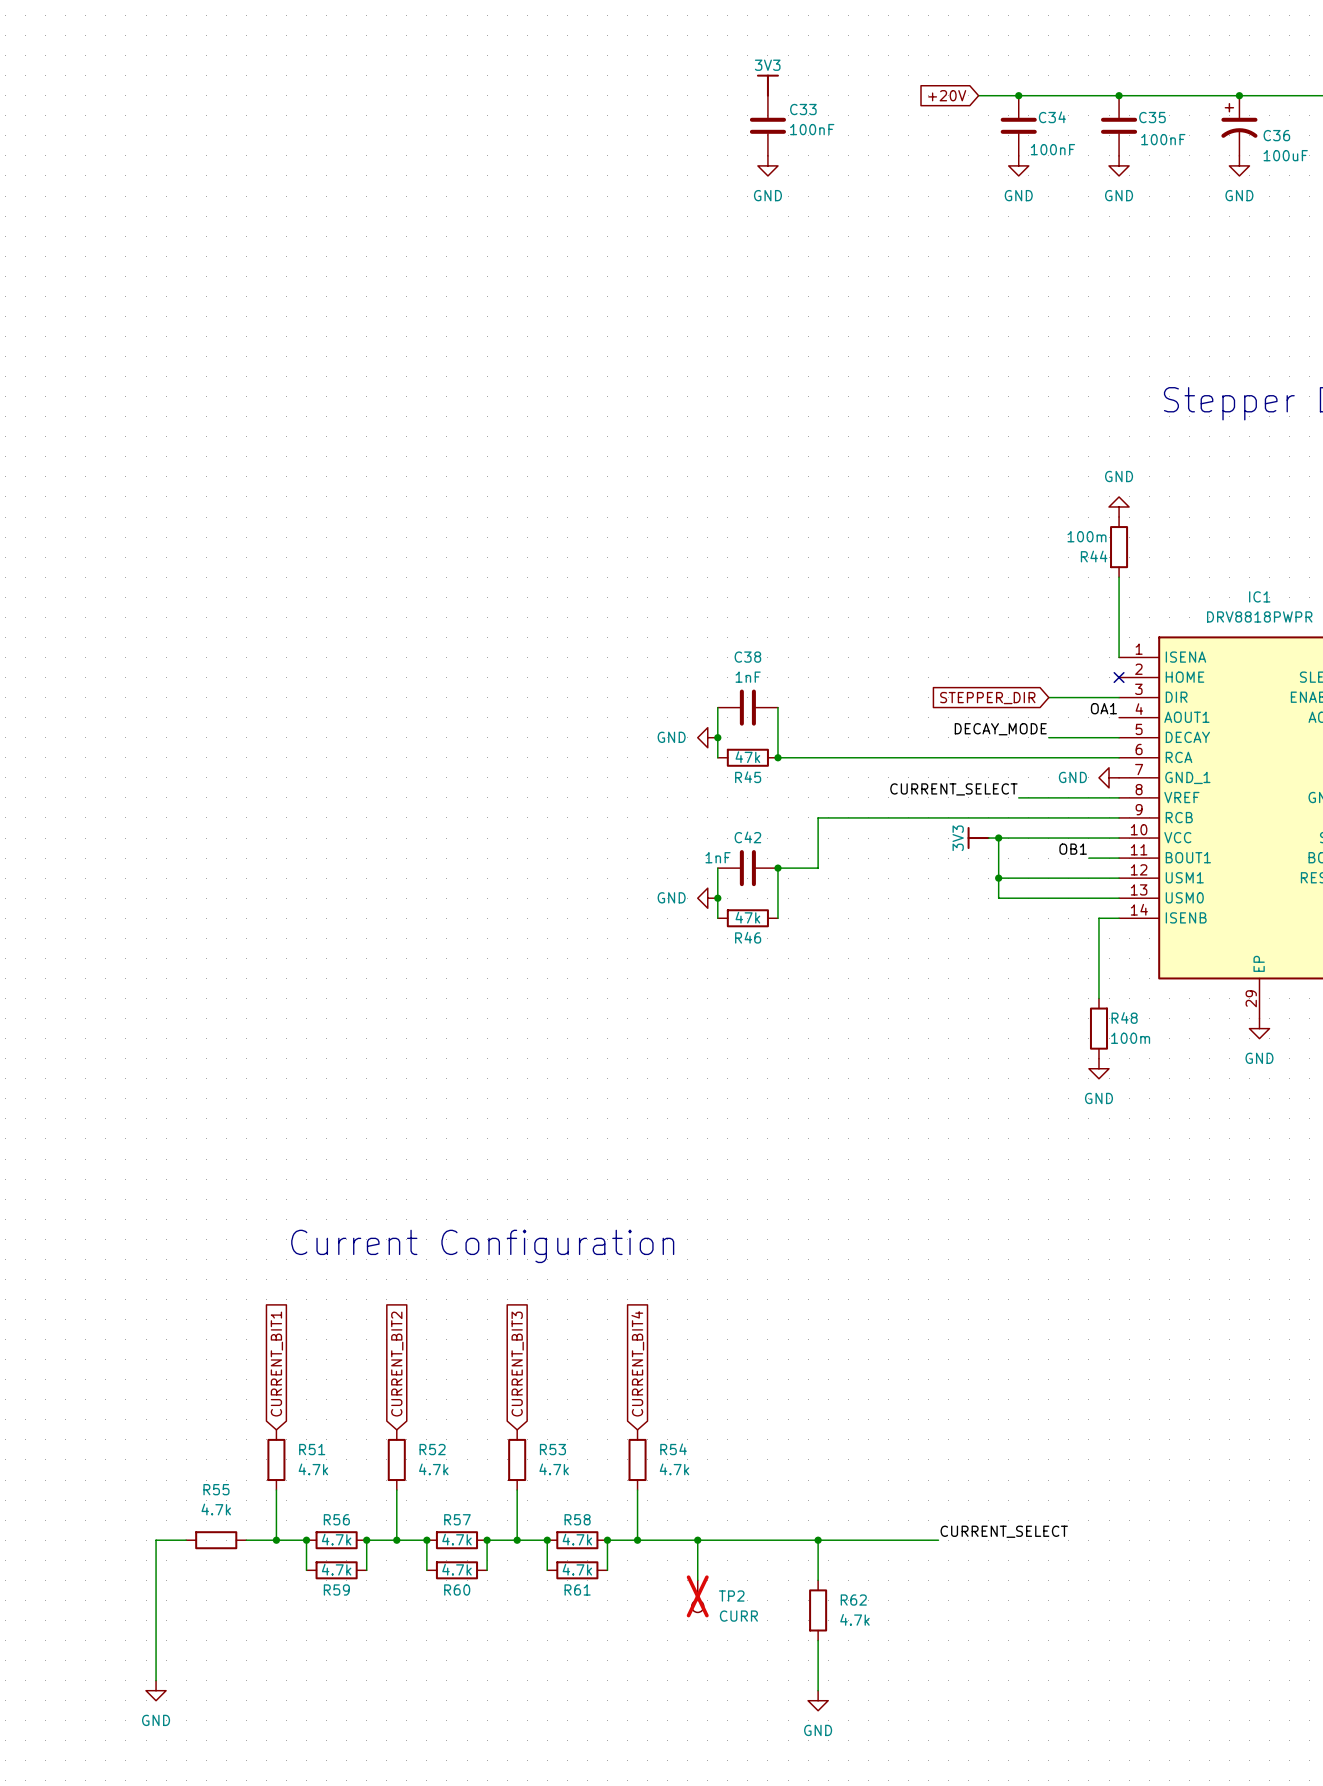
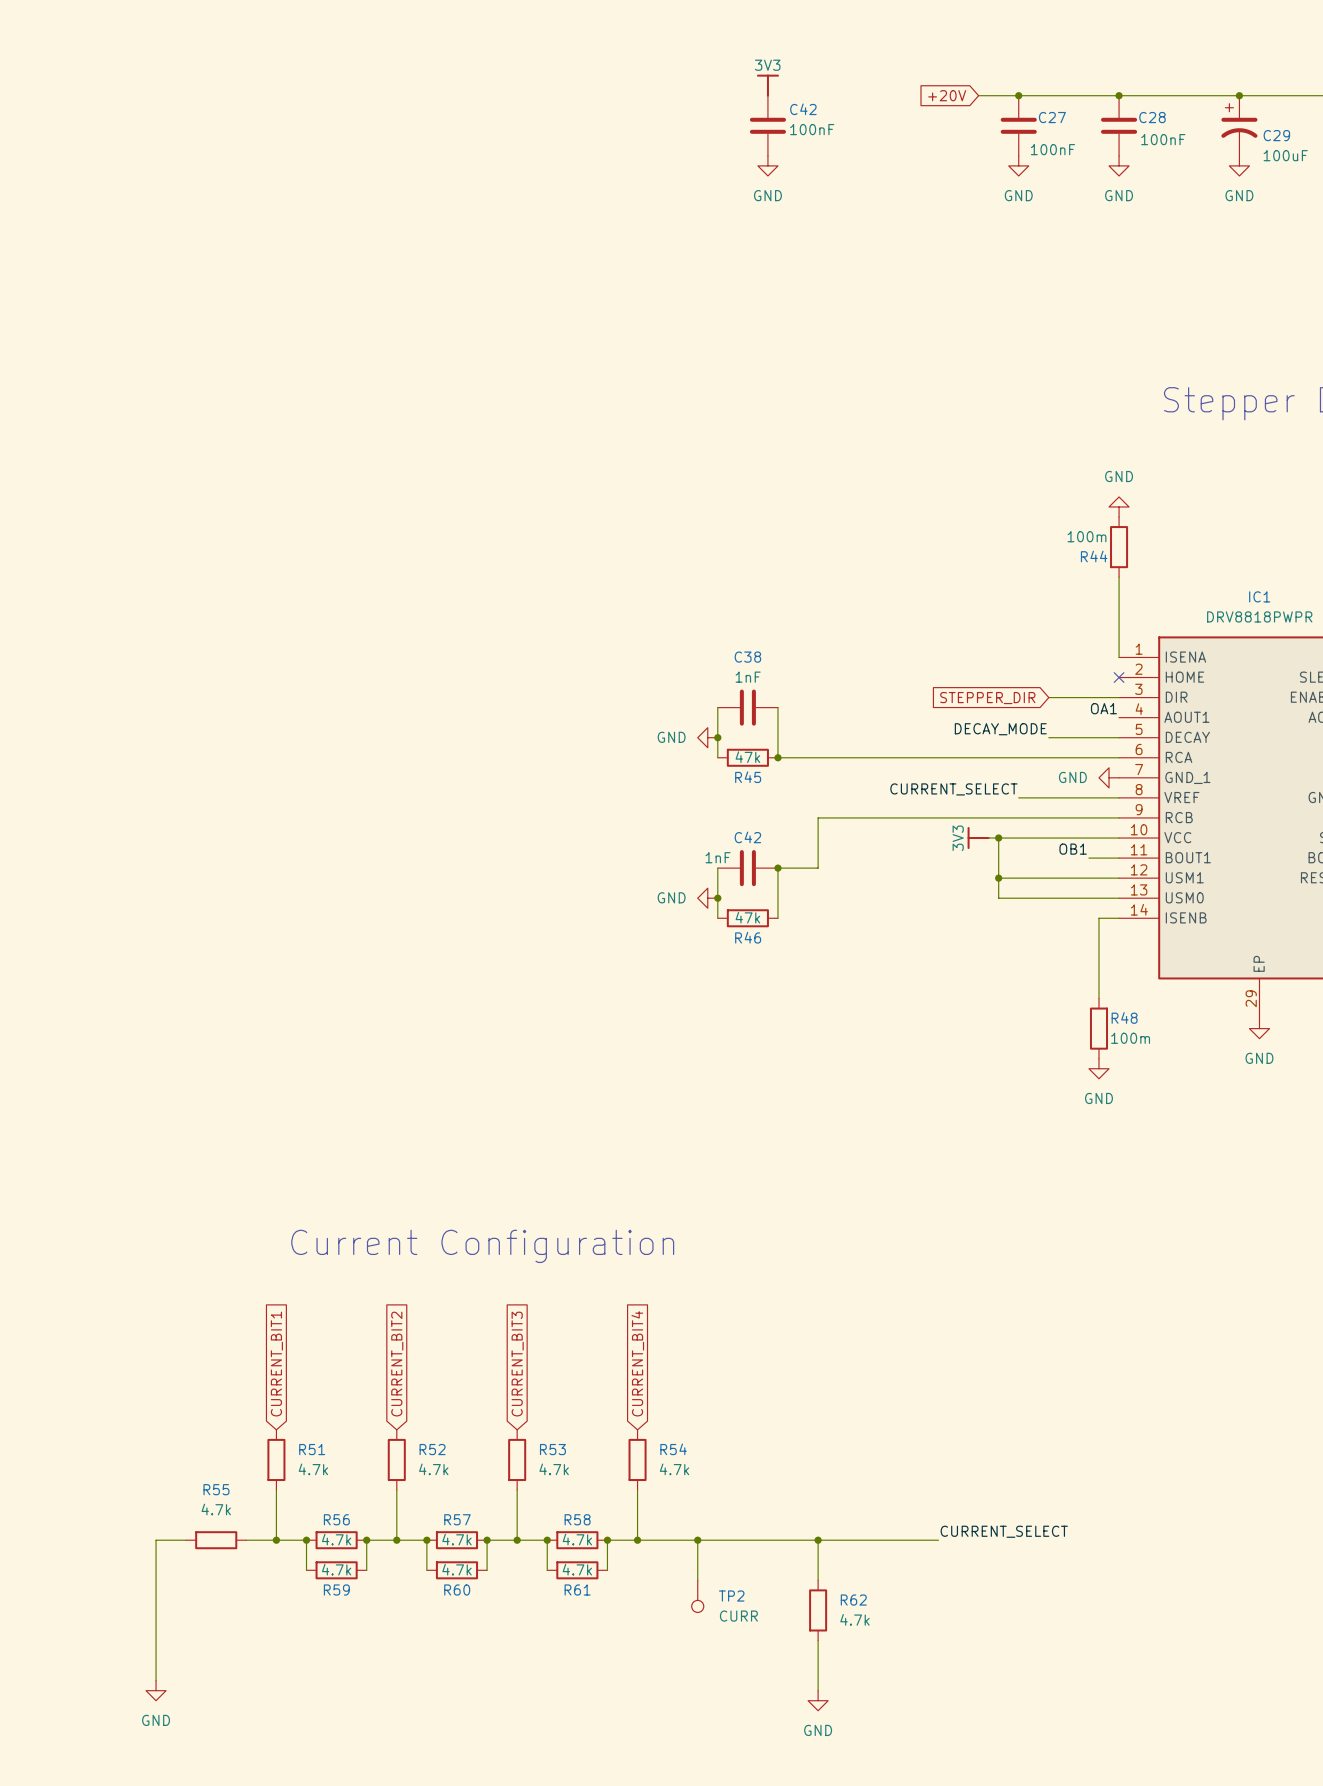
C33 name: C33 (803, 109) -> C42 (803, 109)
C34 name: C34 (1052, 117) -> C27 (1052, 117)
C35 name: C35 (1152, 117) -> C28 (1152, 117)
C36 name: C36 (1276, 135) -> C29 (1276, 135)
TP2 do-not-place cross: (697, 1596) -> none

